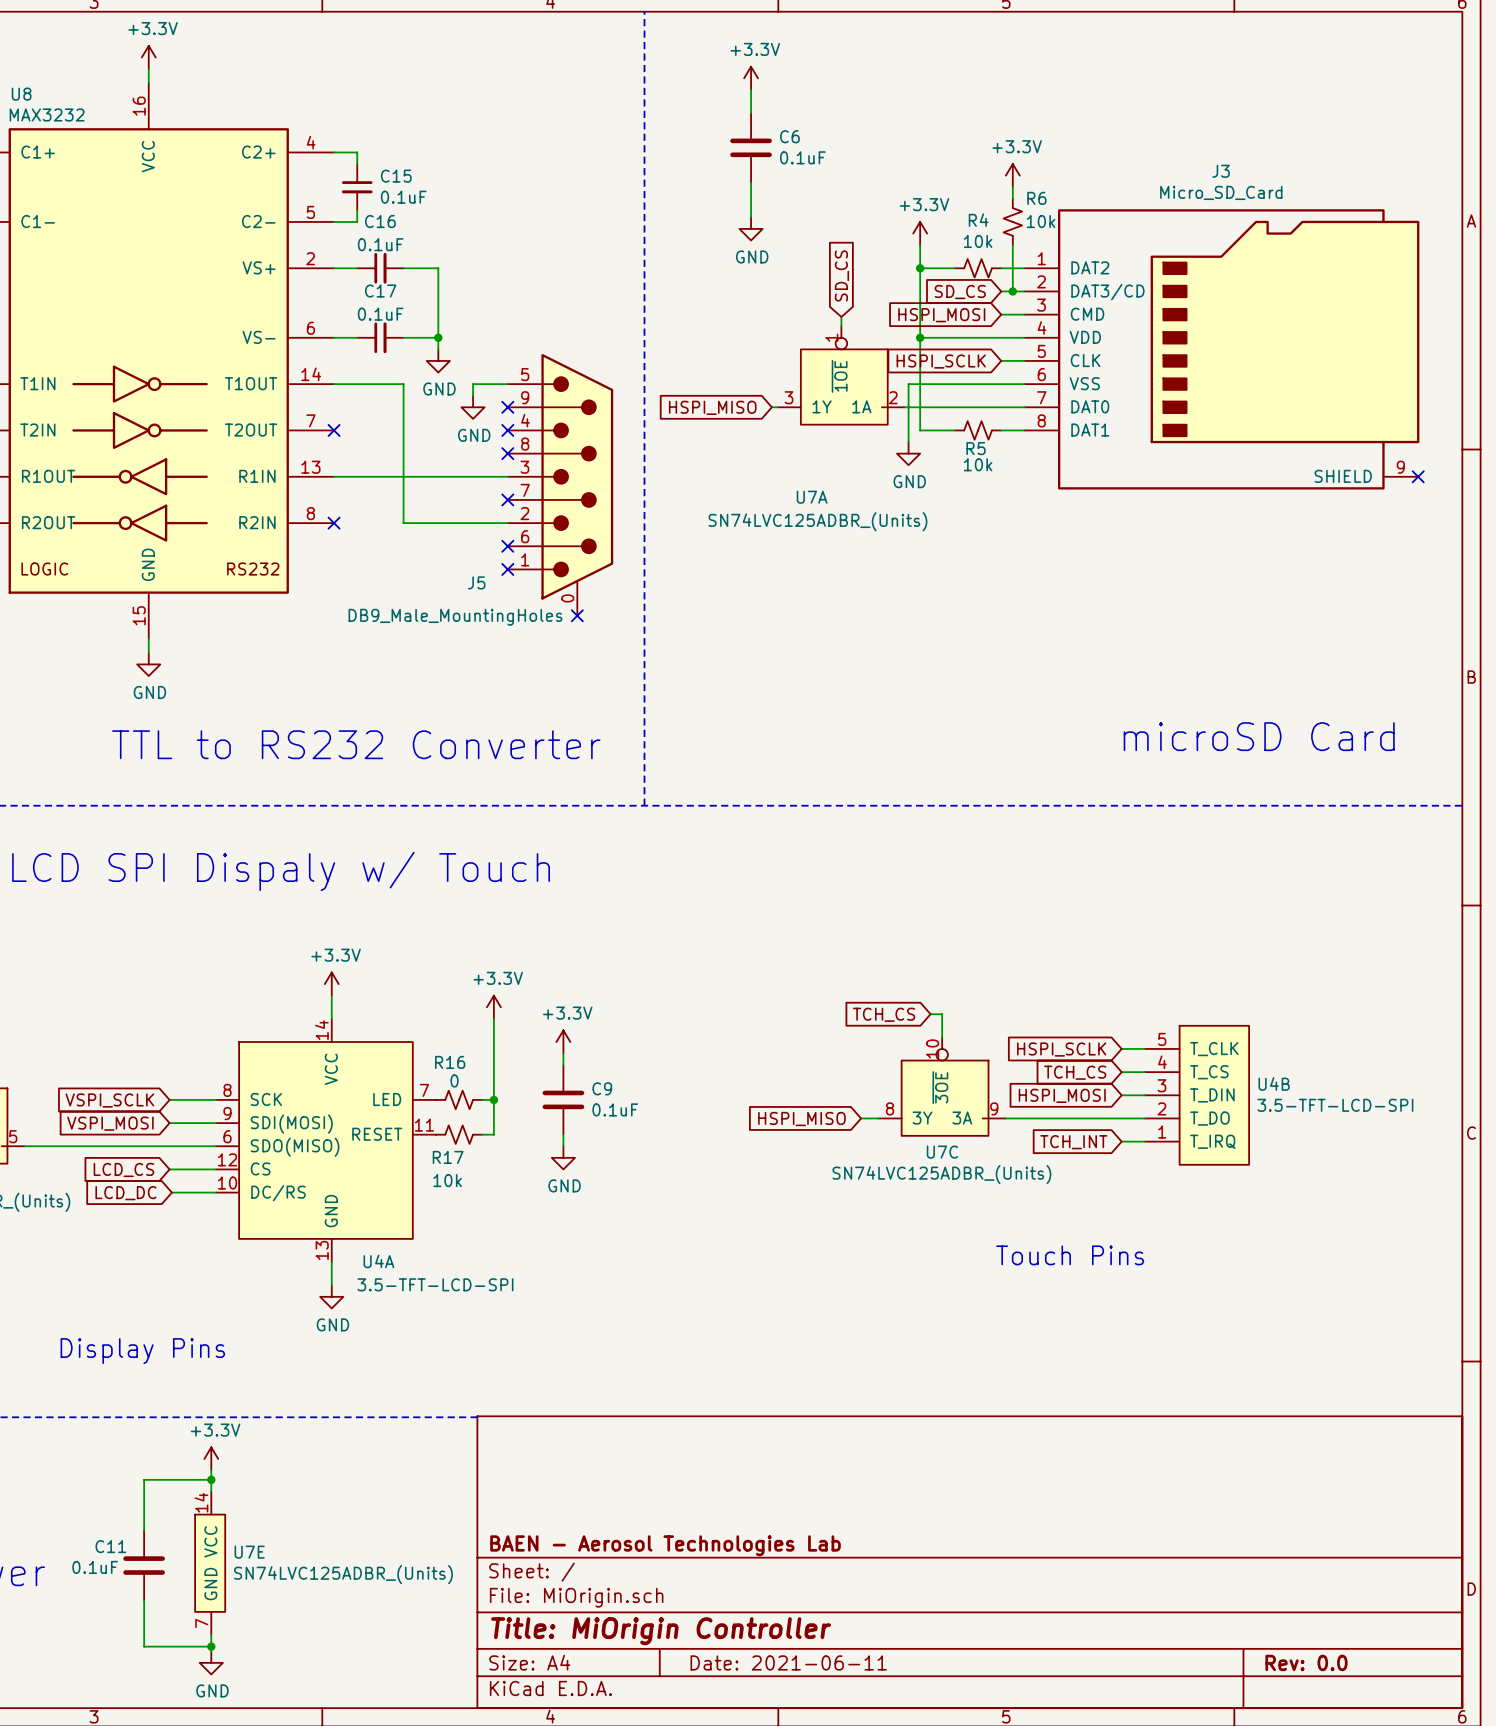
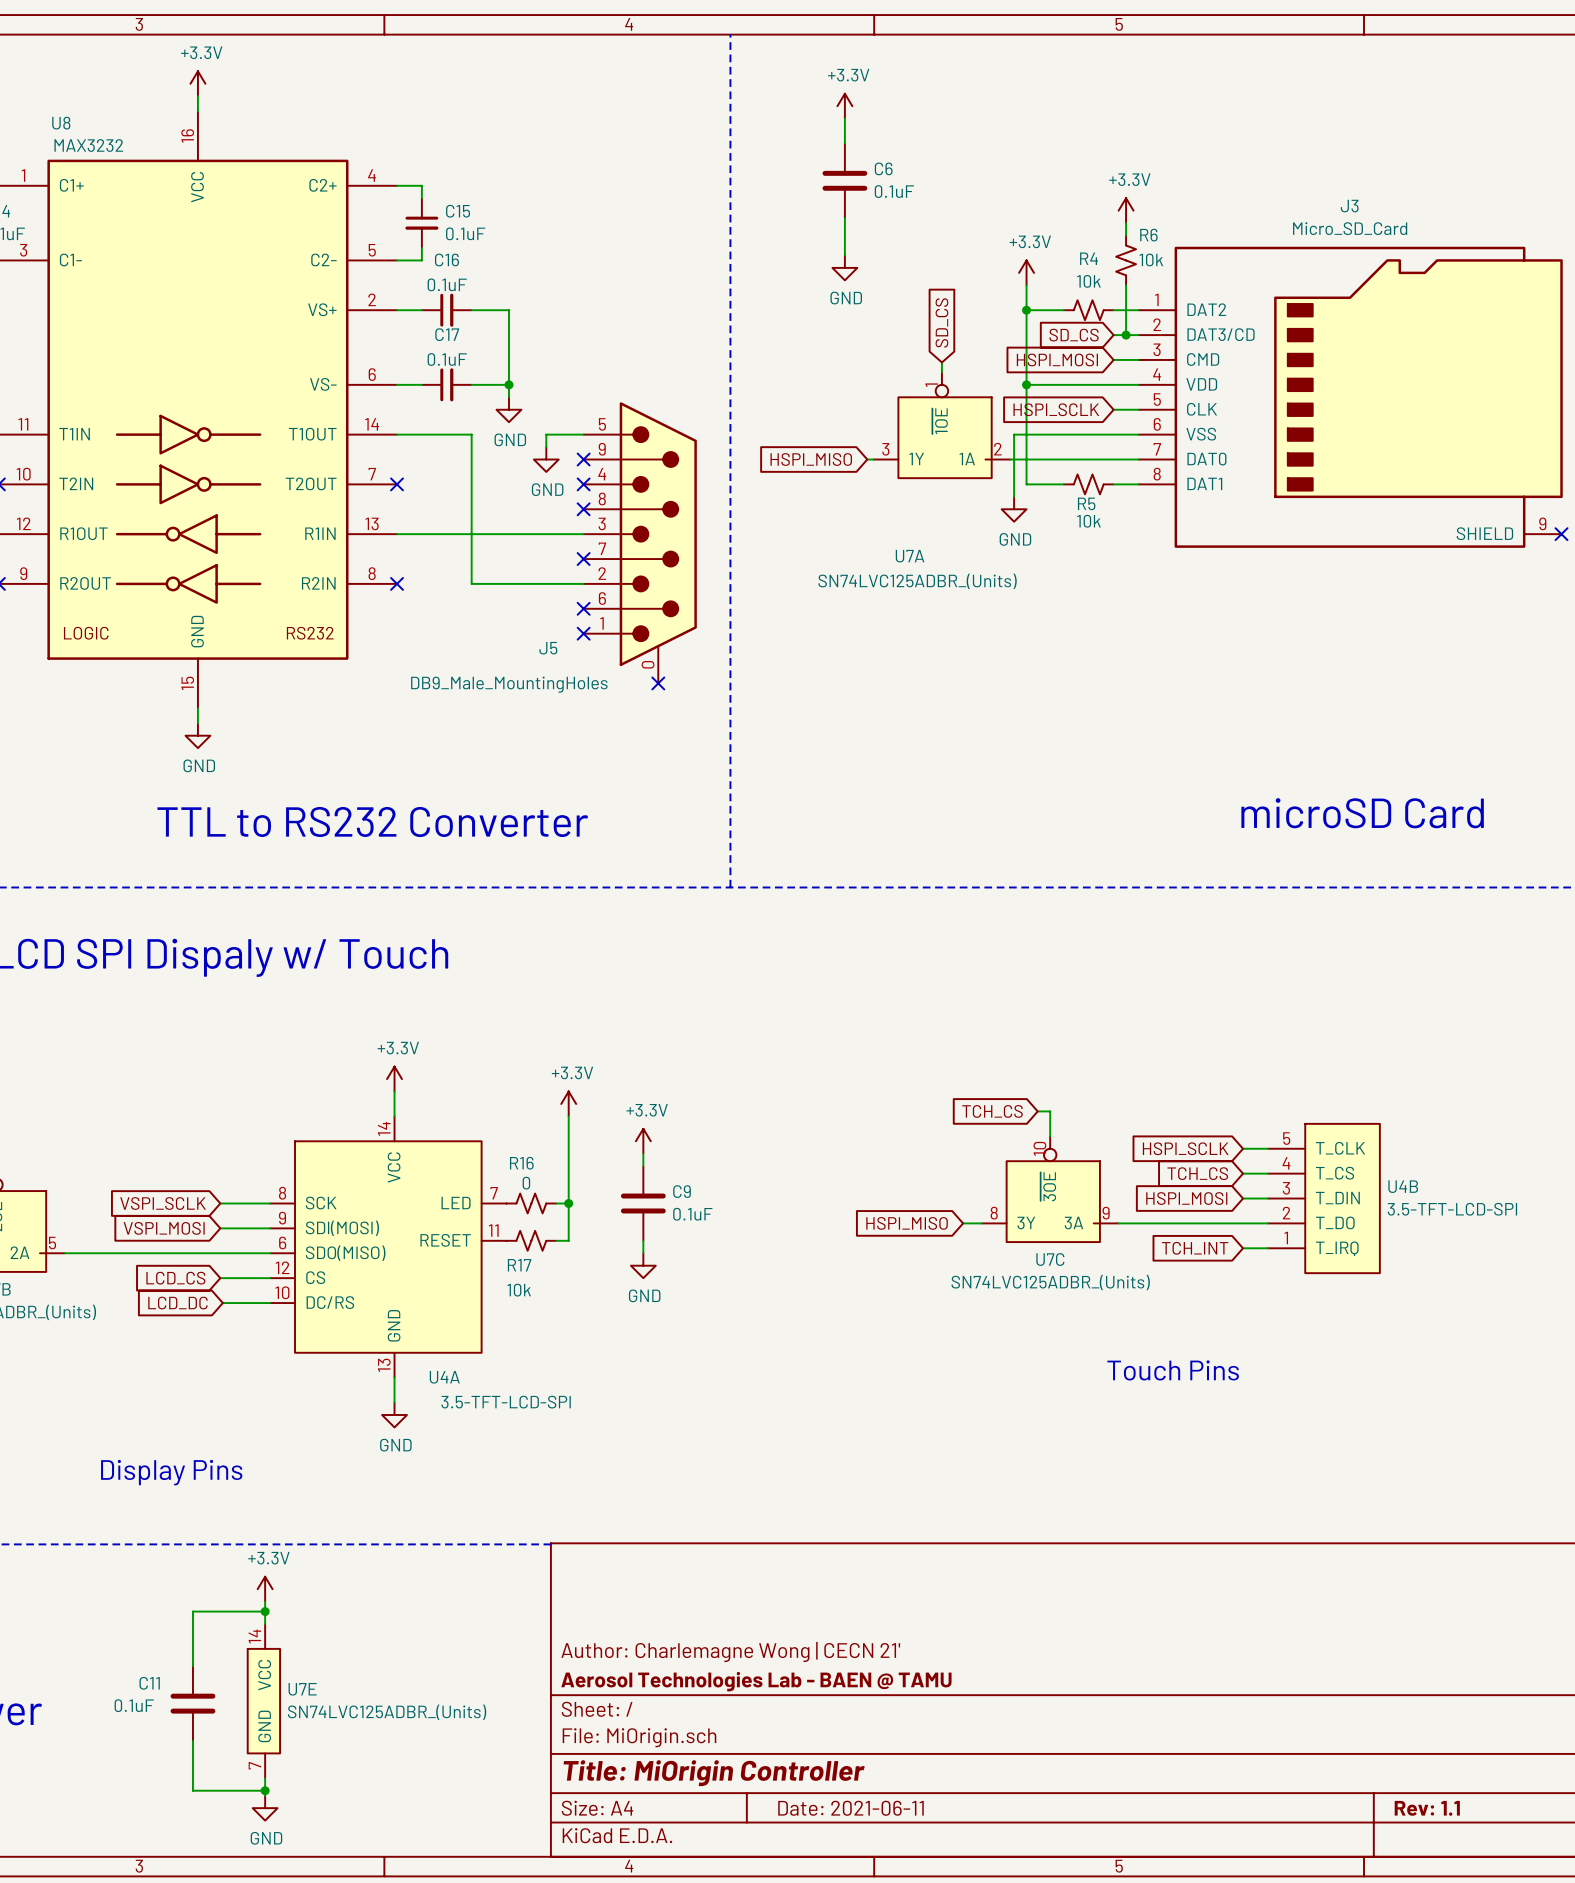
title block: none -> Author: Charlemagne Wong | CECN 21' (730, 1651)
title block: BAEN - Aerosol Technologies Lab (665, 1545) -> Aerosol Technologies Lab - BAEN @ TAMU (756, 1681)
title block: Rev: 0.0 (1306, 1662) -> Rev: 1.1 (1427, 1808)

